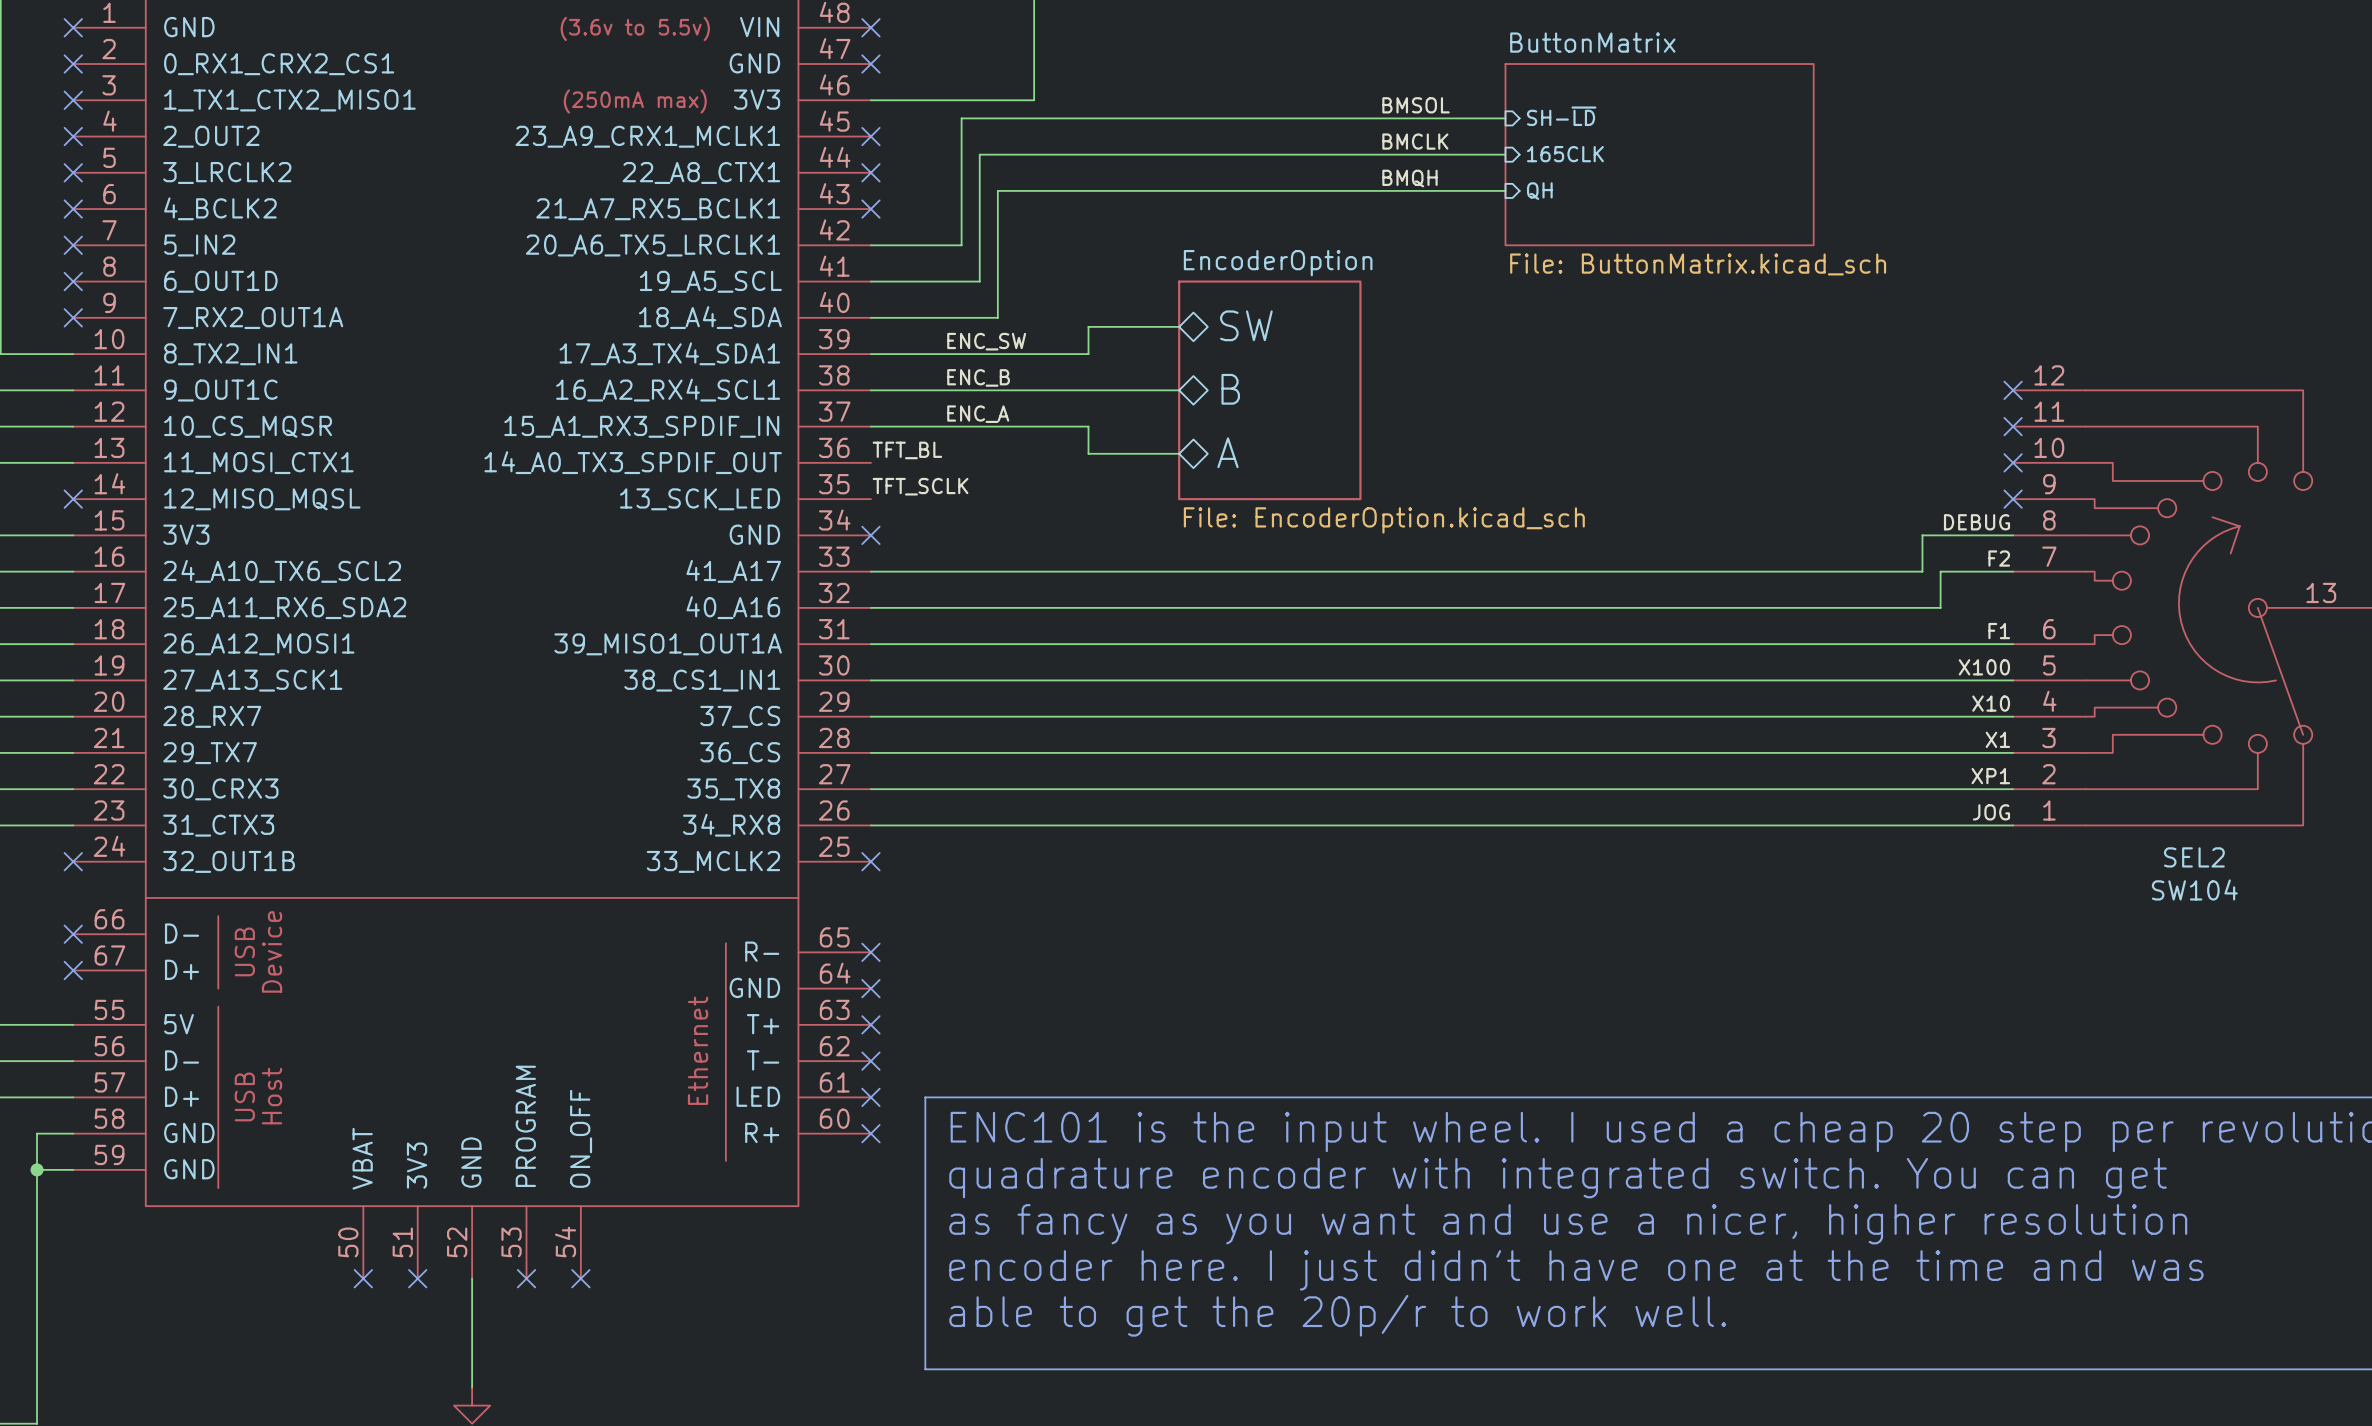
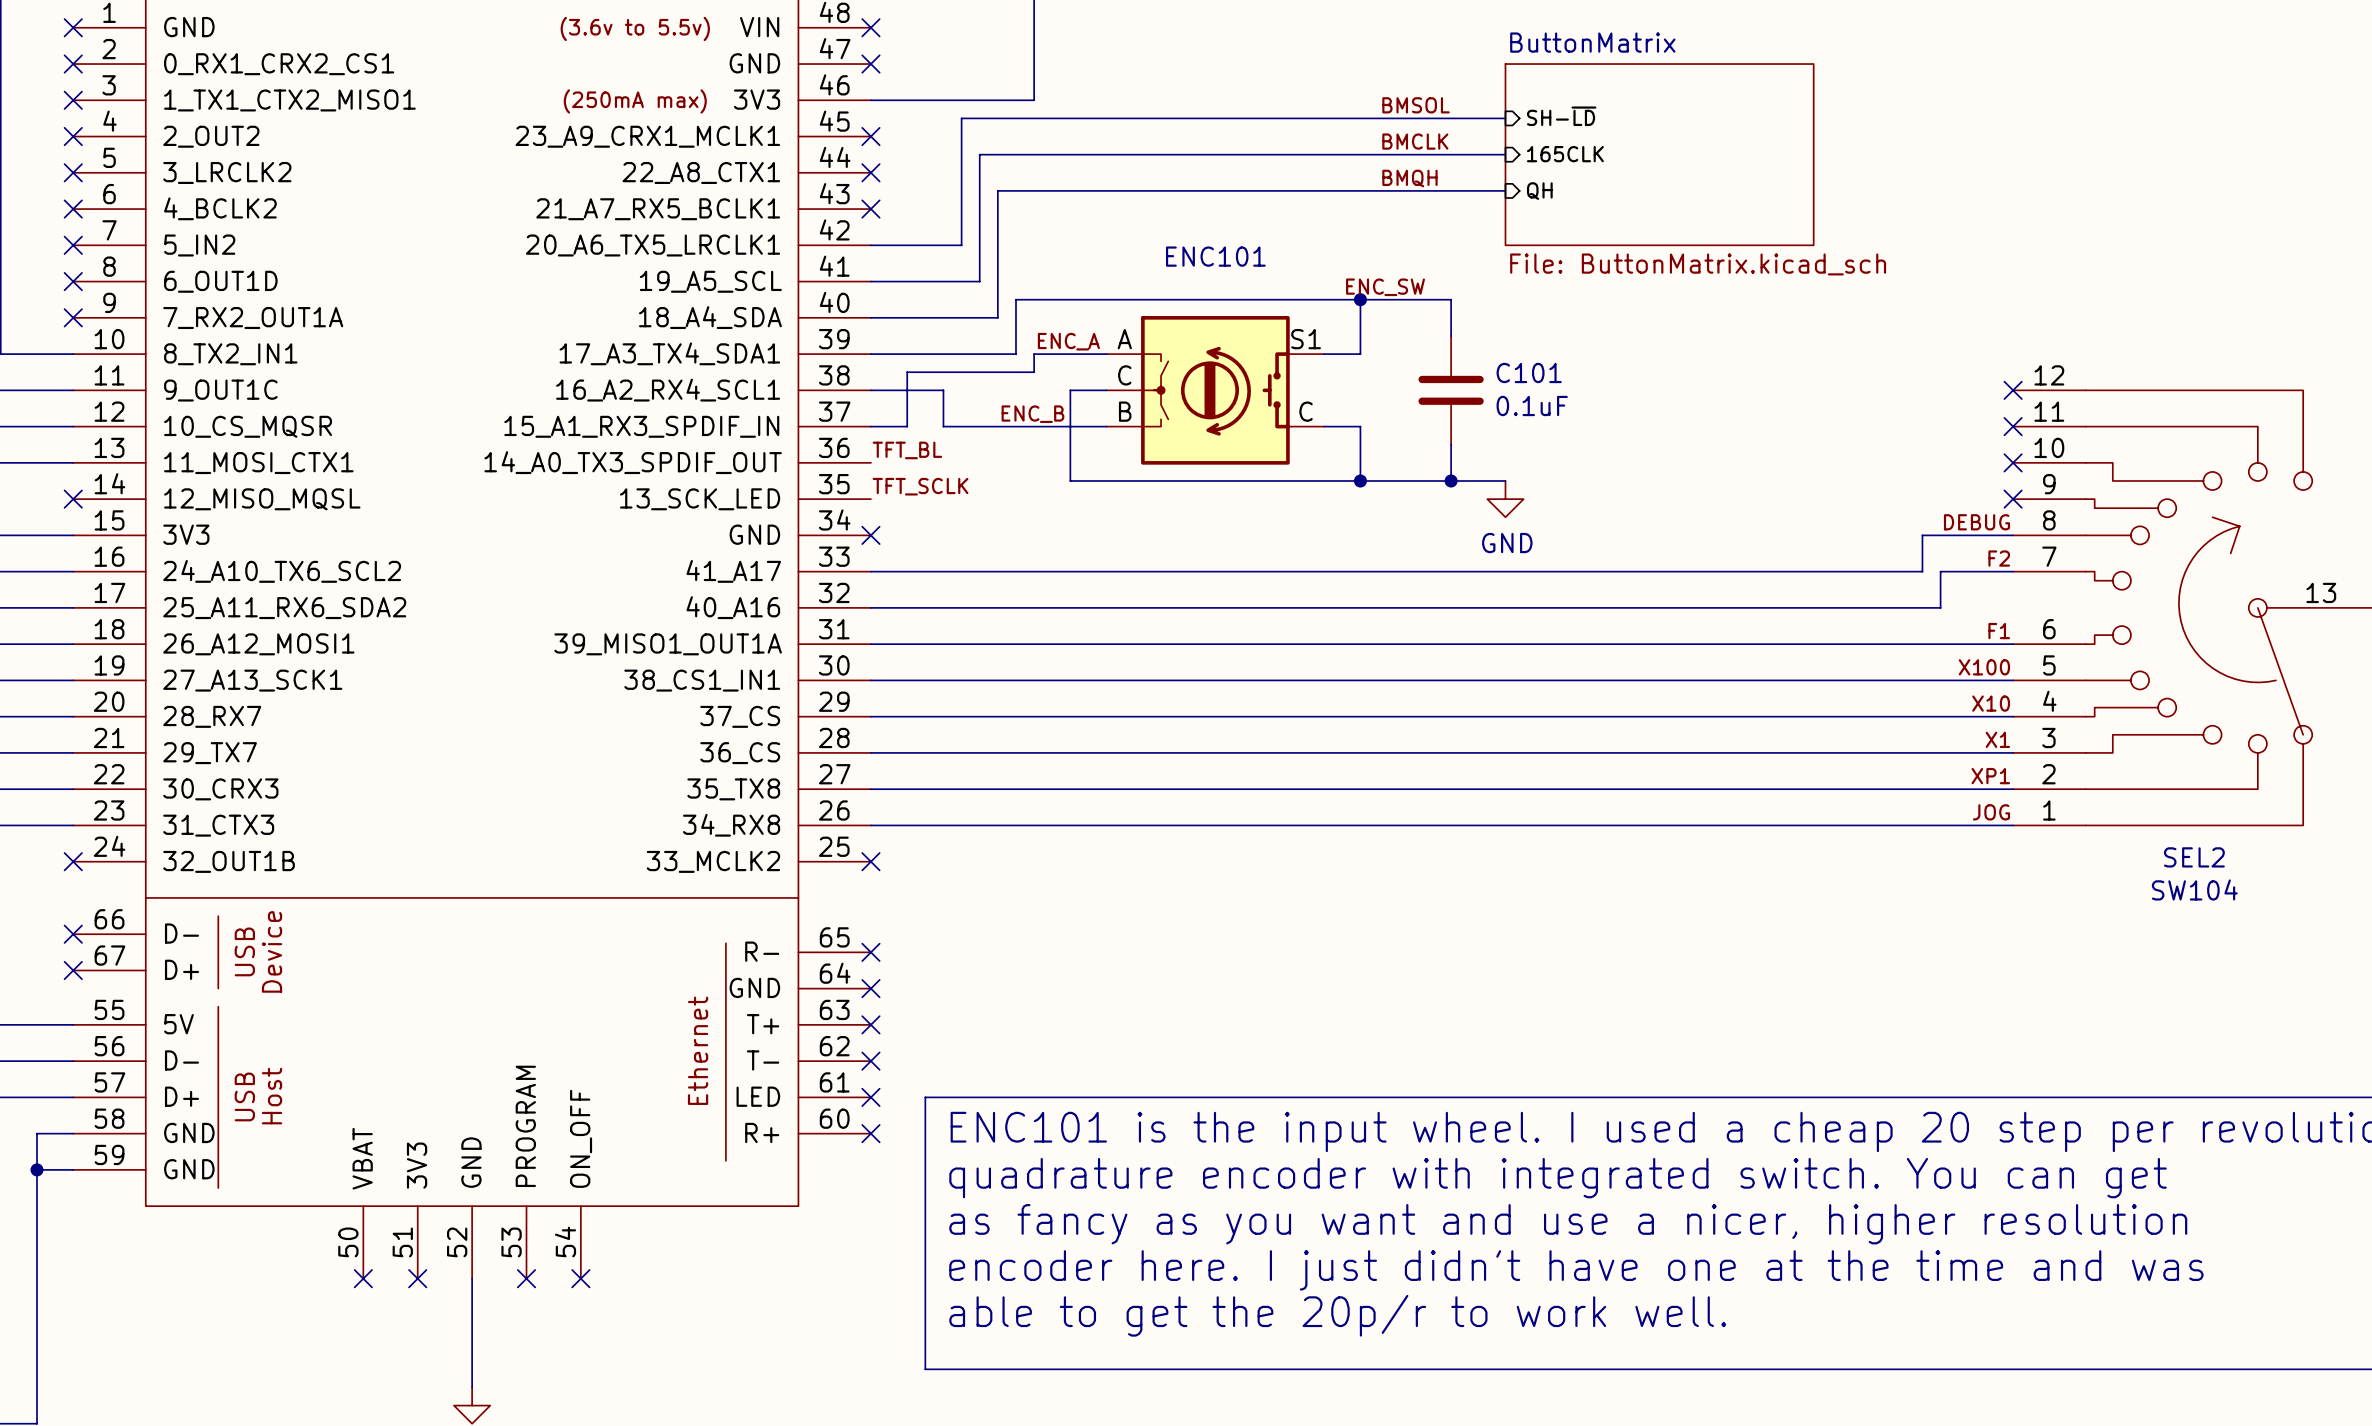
label: none -> ENC_SW (1385, 287)
wire: none -> (1360, 299) (1360, 354) (1324, 354)
junction: none -> (1360, 299)
sheet pin: SW (1246, 325) -> none
wire: (1179, 326) (1088, 326) (1088, 354) -> (1106, 354) (1088, 354)
wire: none -> (1451, 335) (1451, 299) (1015, 299) (1015, 354)
label: ENC_SW (986, 341) -> none
wire: (1015, 354) (1034, 354) -> (907, 426) (907, 372) (1034, 372) (1034, 354)
label position: ENC_B (978, 377) -> ENC_B (1032, 414)
sheet pin: B (1230, 389) -> none
wire: (943, 390) (1070, 390) -> (1505, 480) (1070, 480) (1070, 390)
ENC101: none -> (1215, 390)
sheet EncoderOption: File: EncoderOption.kicad_sch (1269, 390) -> none
C101: none -> 0.1uF (1451, 390)
label position: ENC_A (978, 414) -> ENC_A (1068, 341)
wire: (907, 426) (943, 426) -> (943, 390) (943, 426)
wire: (1088, 426) (1088, 453) (1179, 453) -> (1088, 426) (1106, 426)
wire: none -> (1324, 426) (1360, 426) (1360, 480)
wire: none -> (1451, 444) (1451, 480)
sheet pin: A (1227, 452) -> none
junction: none -> (1360, 480)
junction: none -> (1451, 480)
power symbol: none -> GND (1505, 499)

